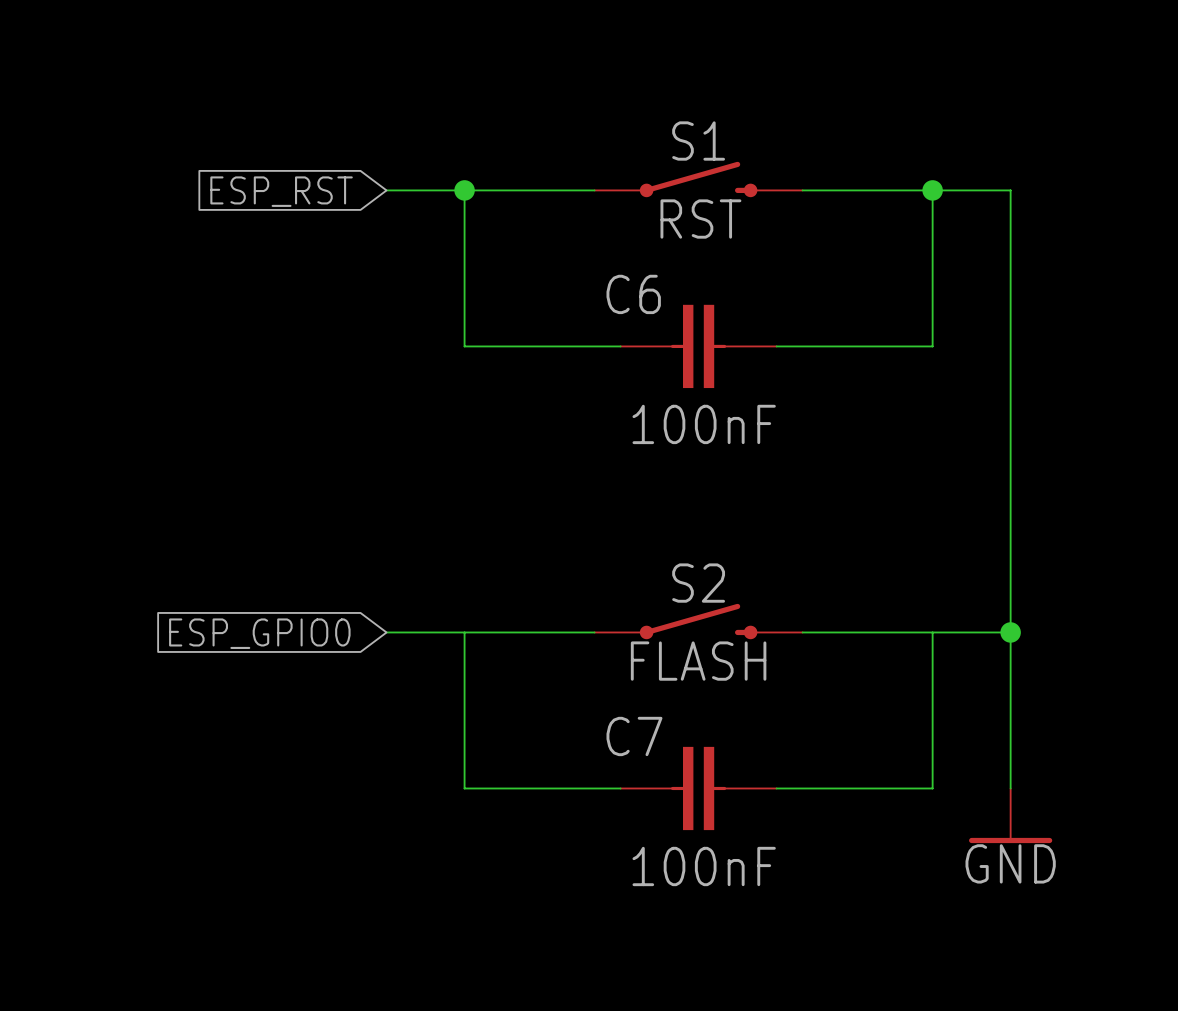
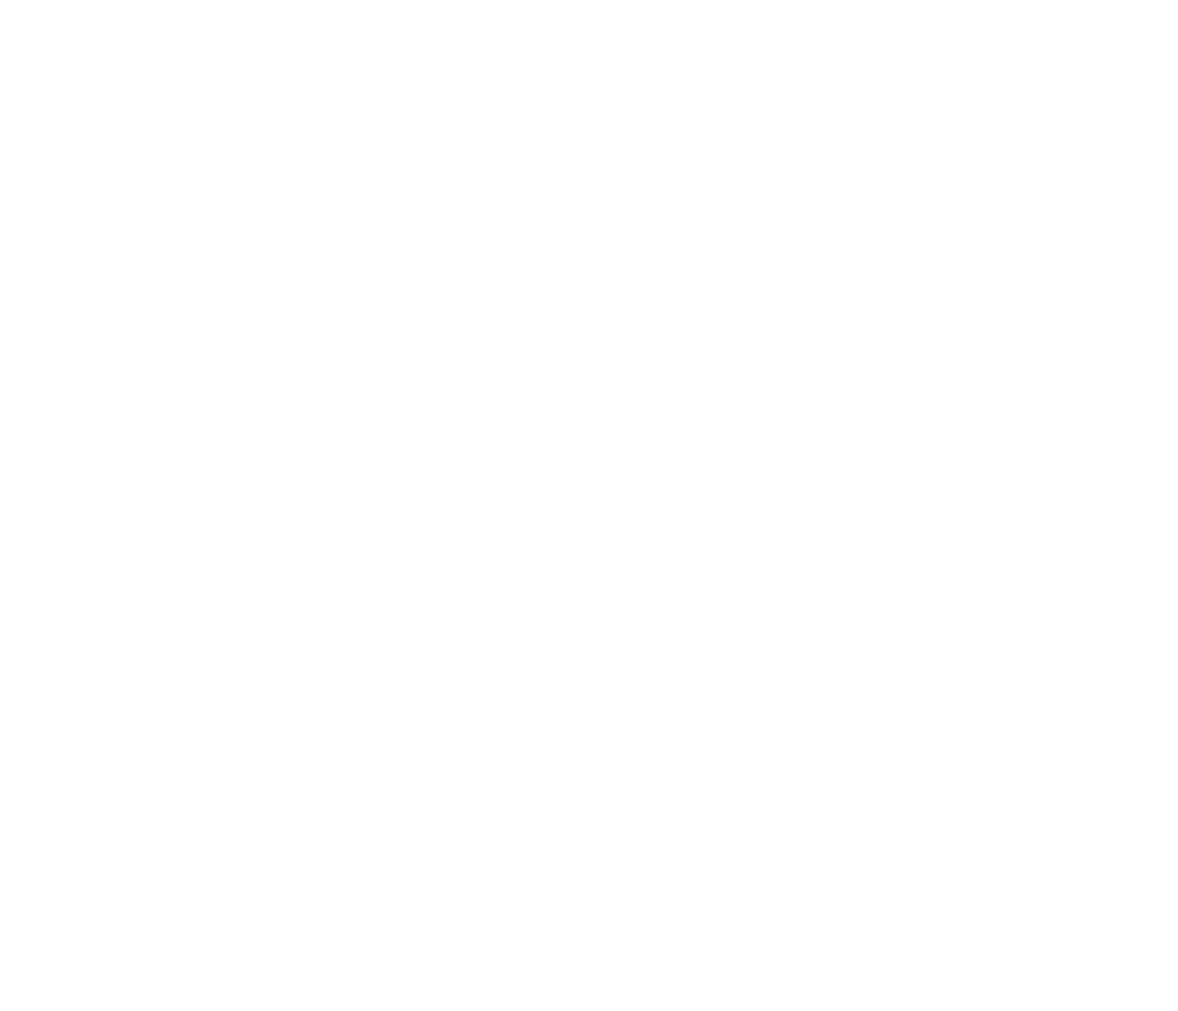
S1: RST (698, 179) -> none
wire: (386, 190) (594, 190) -> none
wire: (464, 190) (464, 346) (620, 346) -> none
junction: (464, 190) -> none
wire: (802, 190) (1010, 190) (1010, 788) -> none
wire: (932, 190) (932, 346) (776, 346) -> none
junction: (932, 190) -> none
global label: ESP_RST (281, 191) -> none
C6: 100nF (698, 346) -> none
S2: FLASH (698, 621) -> none
wire: (386, 632) (594, 632) -> none
wire: (464, 632) (464, 788) (620, 788) -> none
wire: (802, 632) (1010, 632) -> none
wire: (932, 632) (932, 788) (776, 788) -> none
junction: (1010, 632) -> none
global label: ESP_GPIO0 (259, 633) -> none
C7: 100nF (698, 788) -> none
power symbol: GND (1010, 815) -> none

